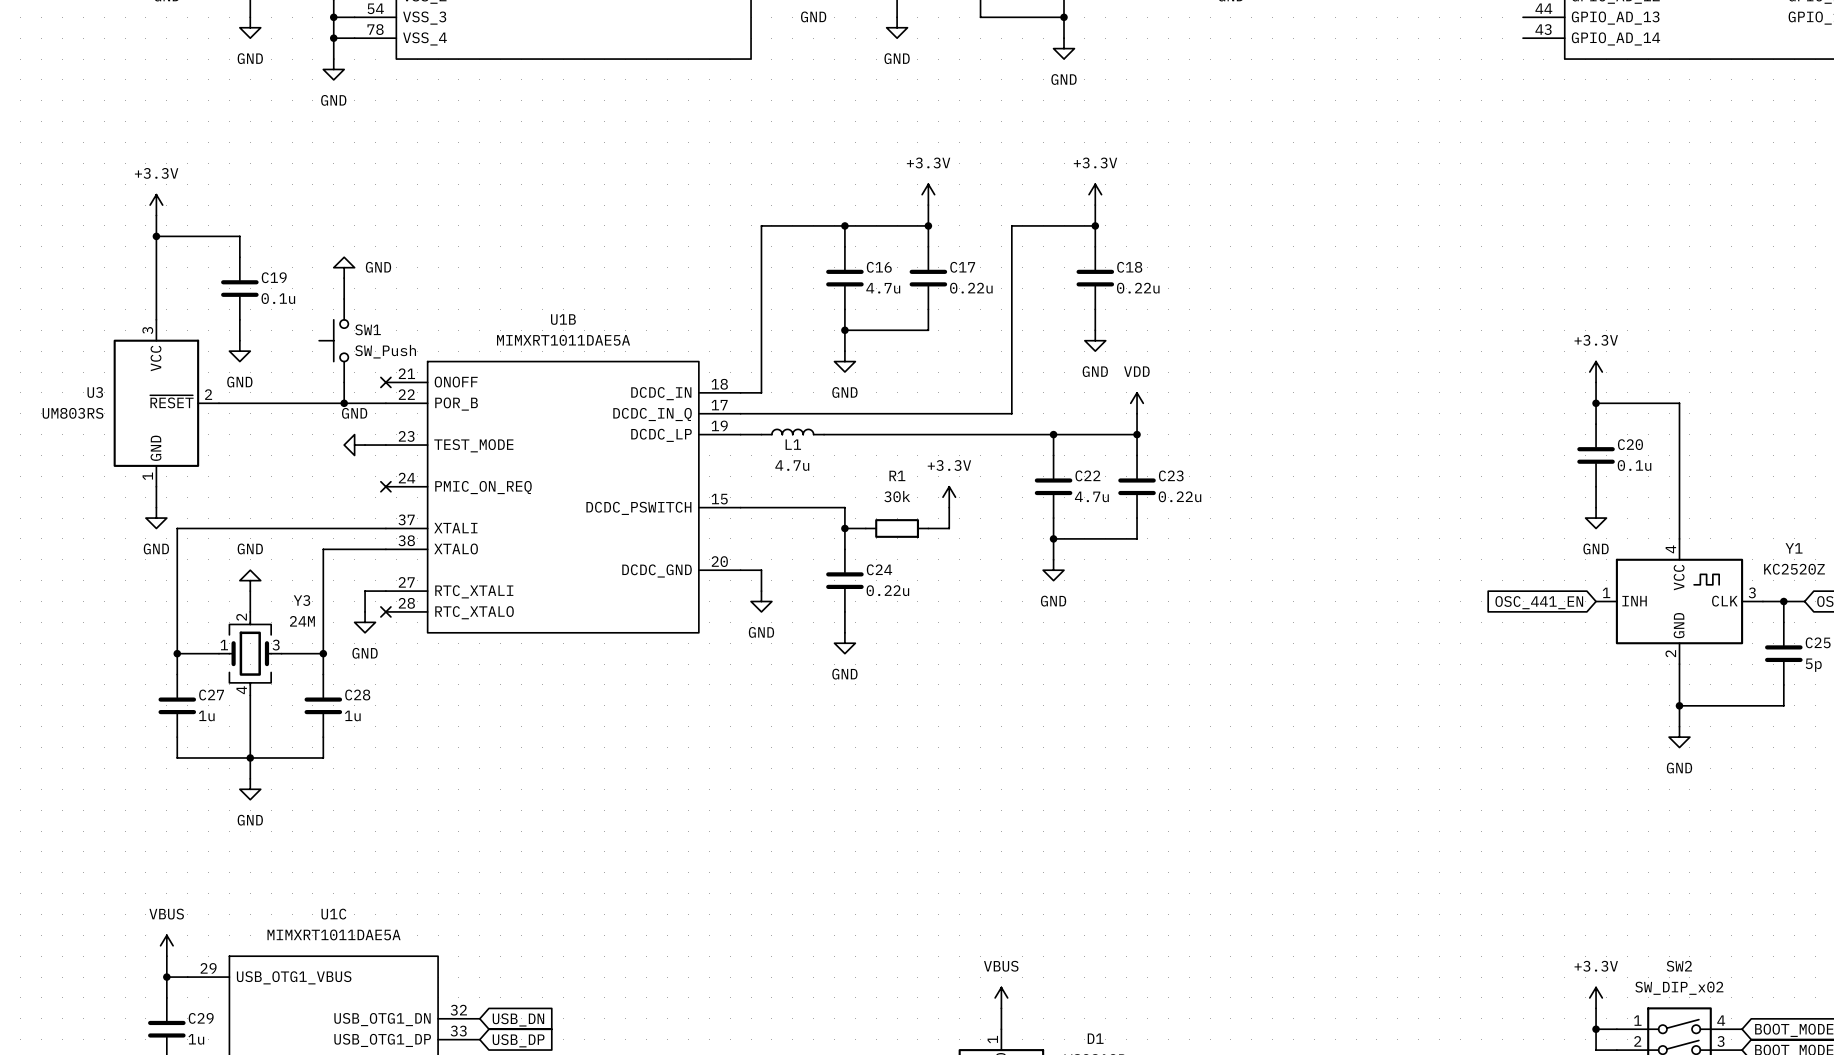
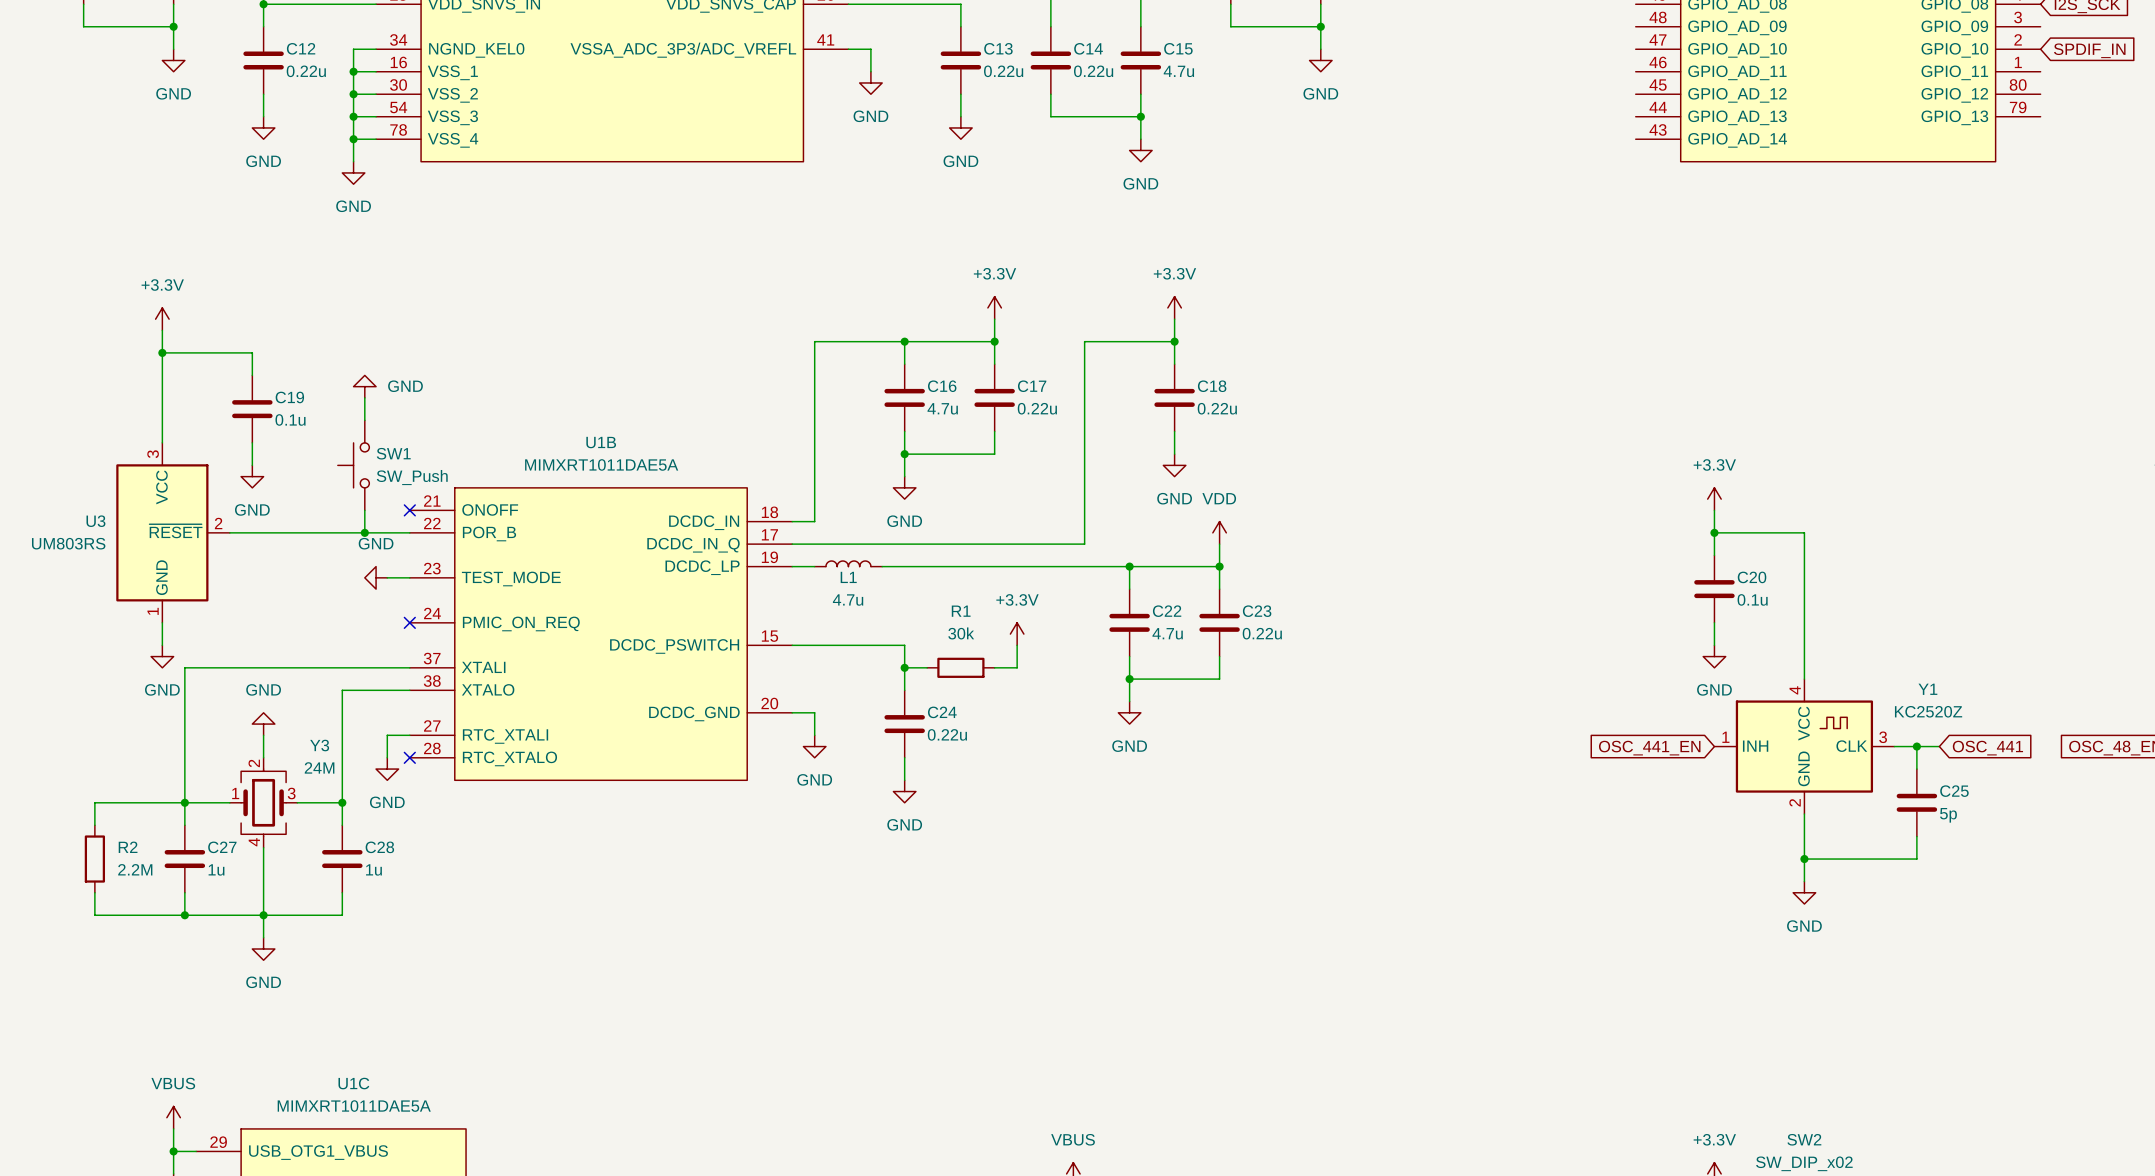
wire: none -> (184, 802) (94, 802) (94, 825)
R2: none -> 2.2M (94, 859)
wire: none -> (94, 892) (94, 915) (184, 915)
junction: none -> (184, 915)

